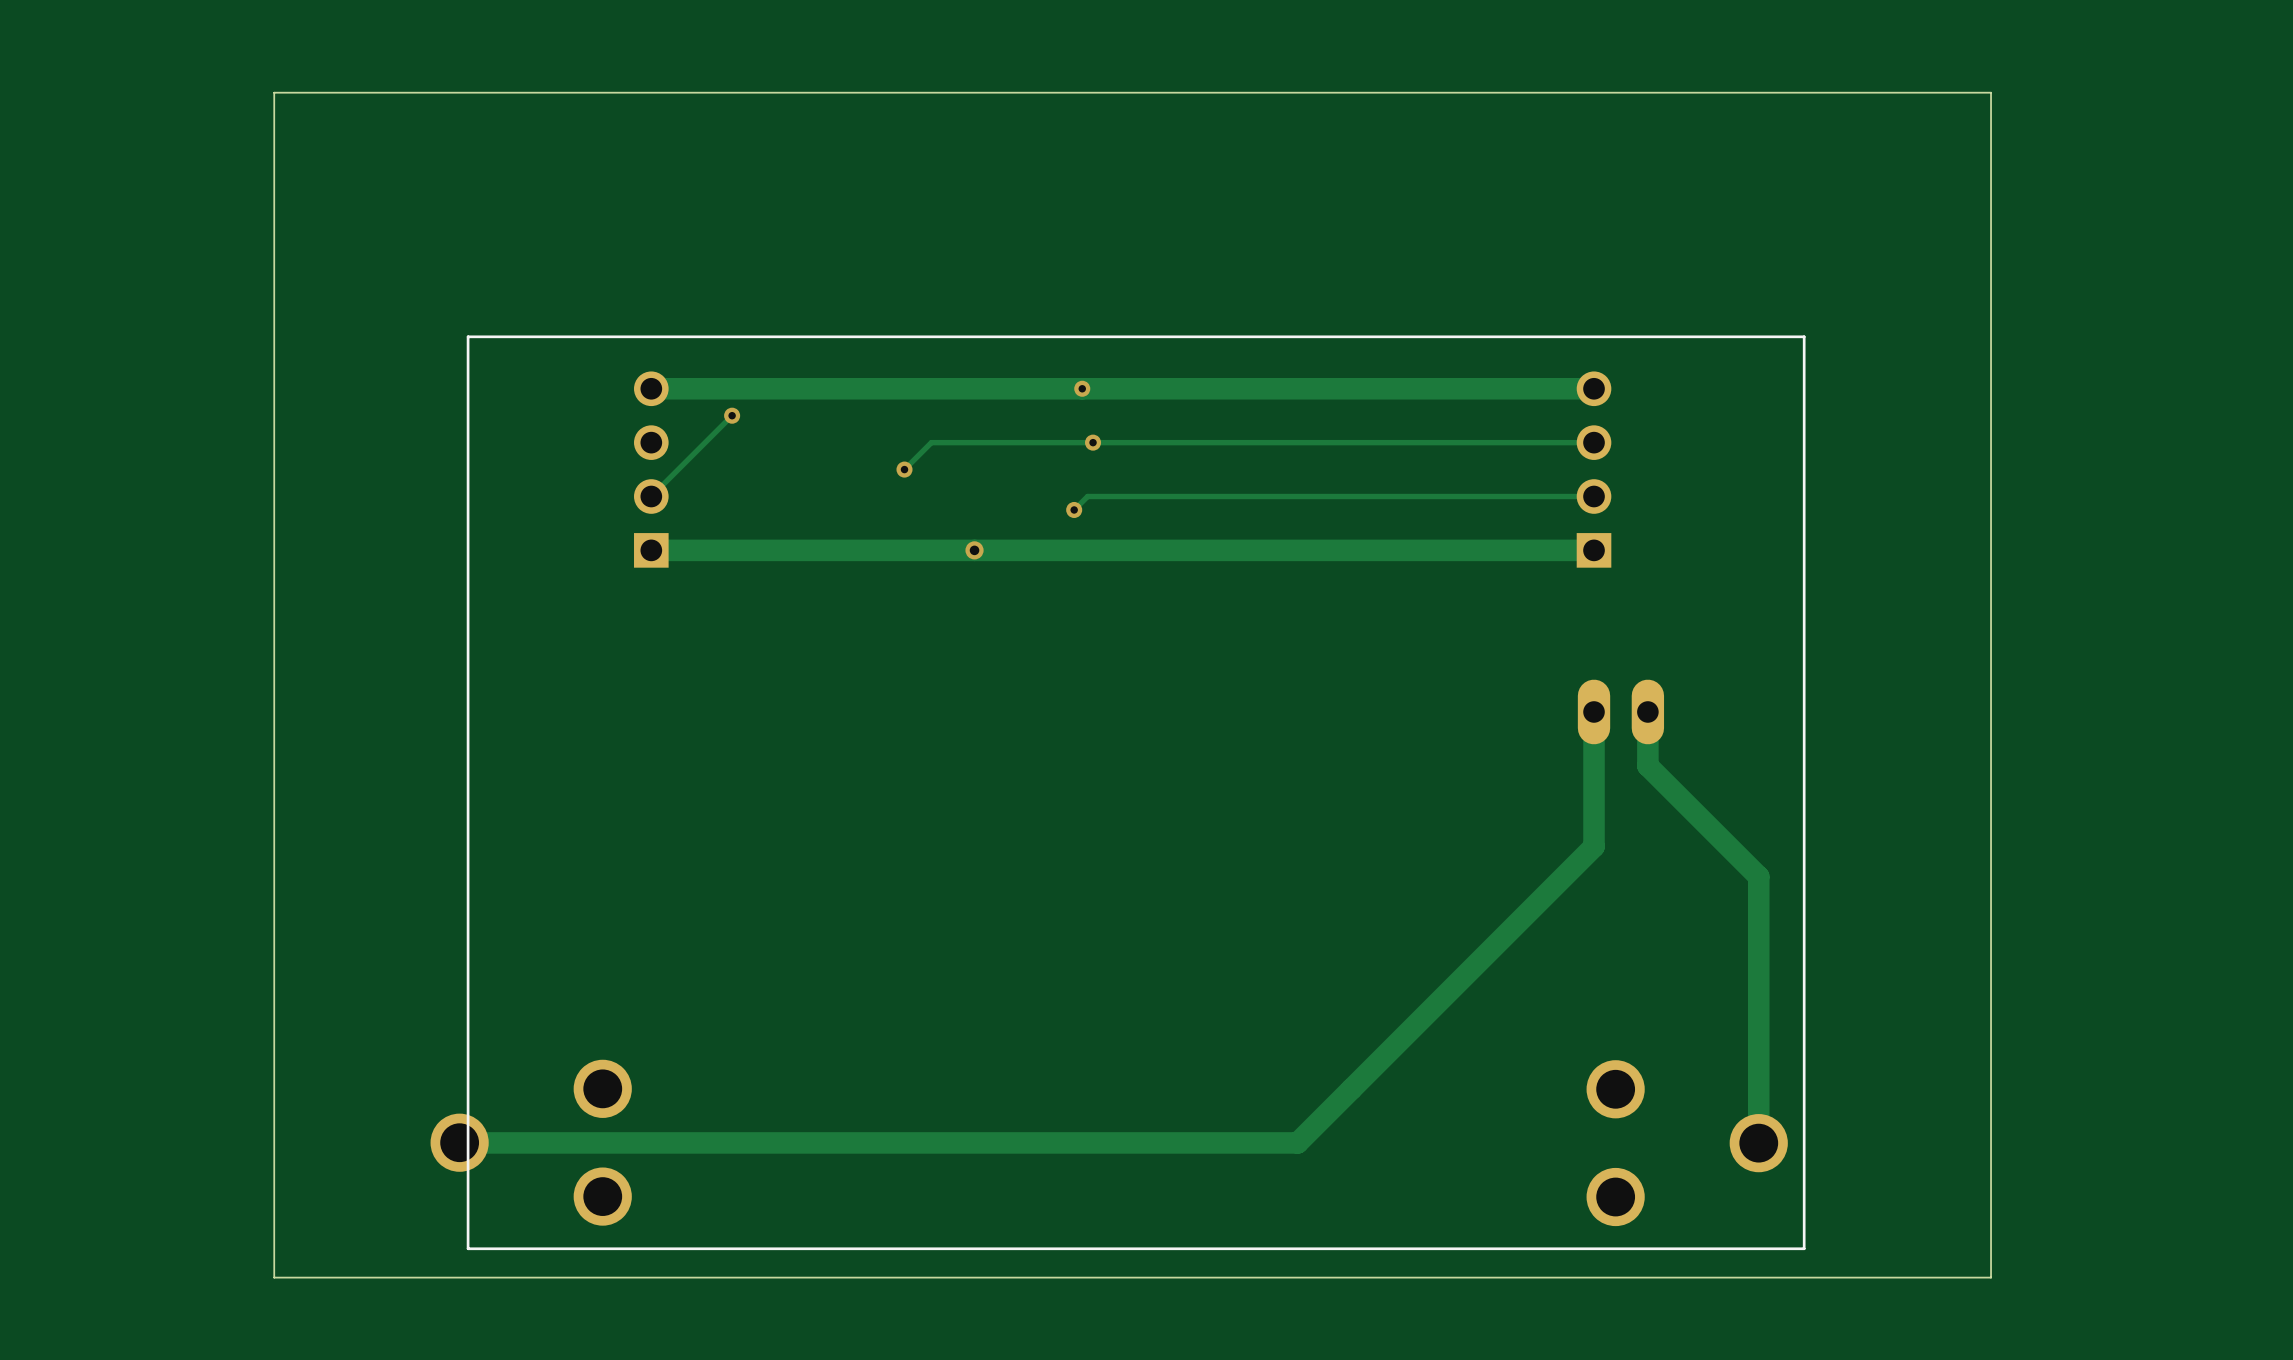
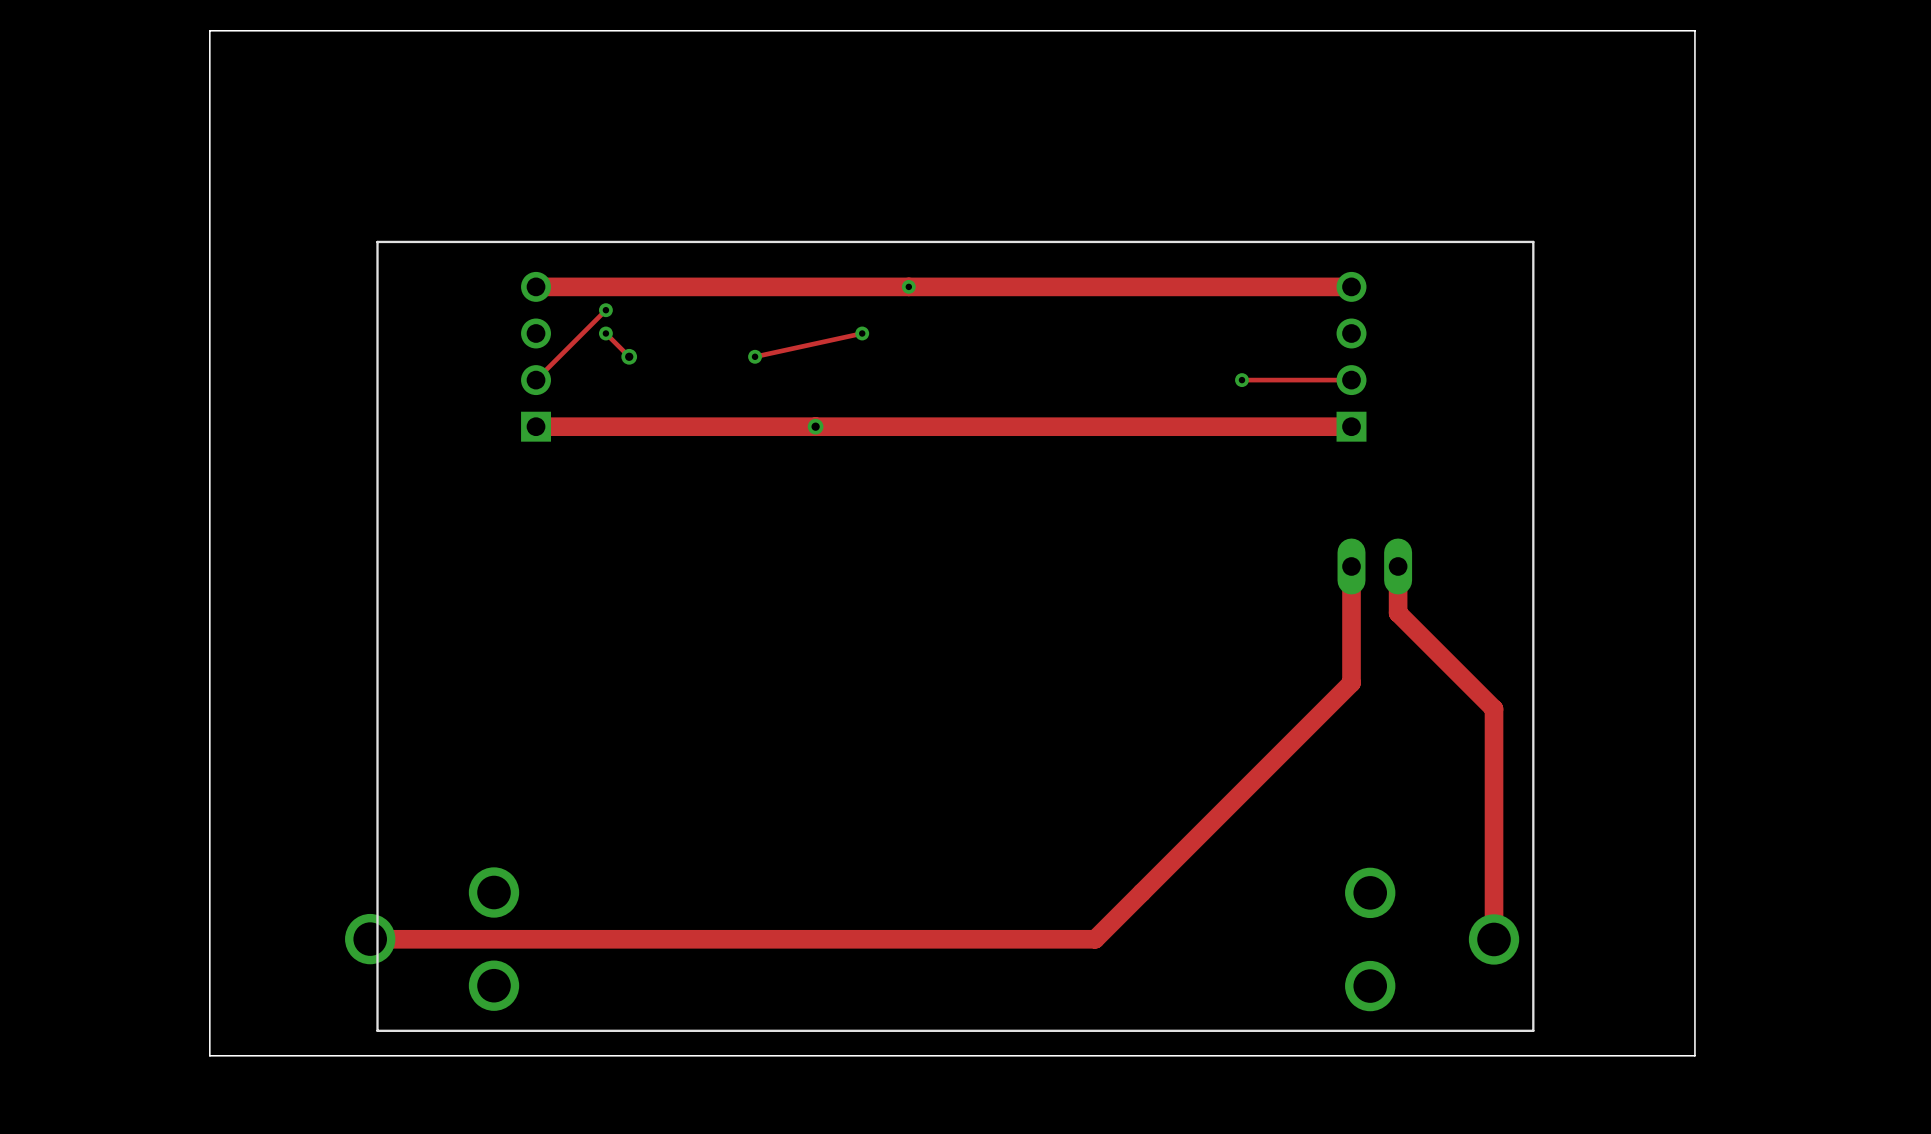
track: none -> (605, 333) (629, 356)
via: none -> (605, 333)
via: none -> (862, 333)
via: (1093, 442) -> none
track: (1594, 442) (931, 442) (904, 469) -> (862, 333) (755, 356)
via: none -> (629, 356)
track: (1467, 496) (1087, 496) (1074, 509) -> none
via: none -> (1241, 380)
via: (1074, 509) -> none

